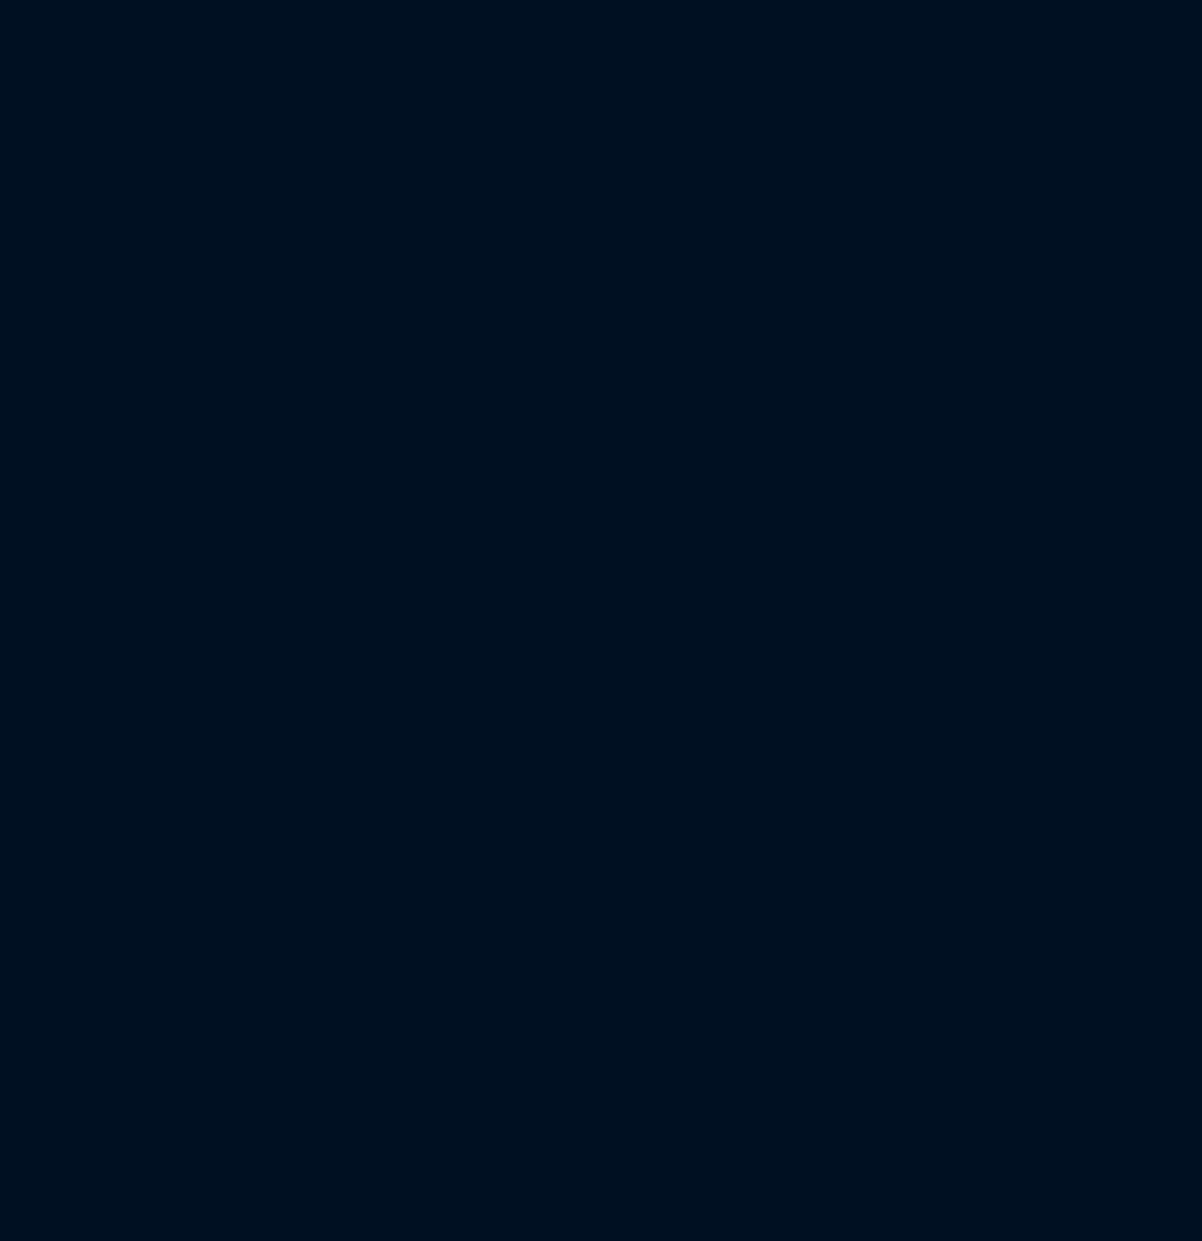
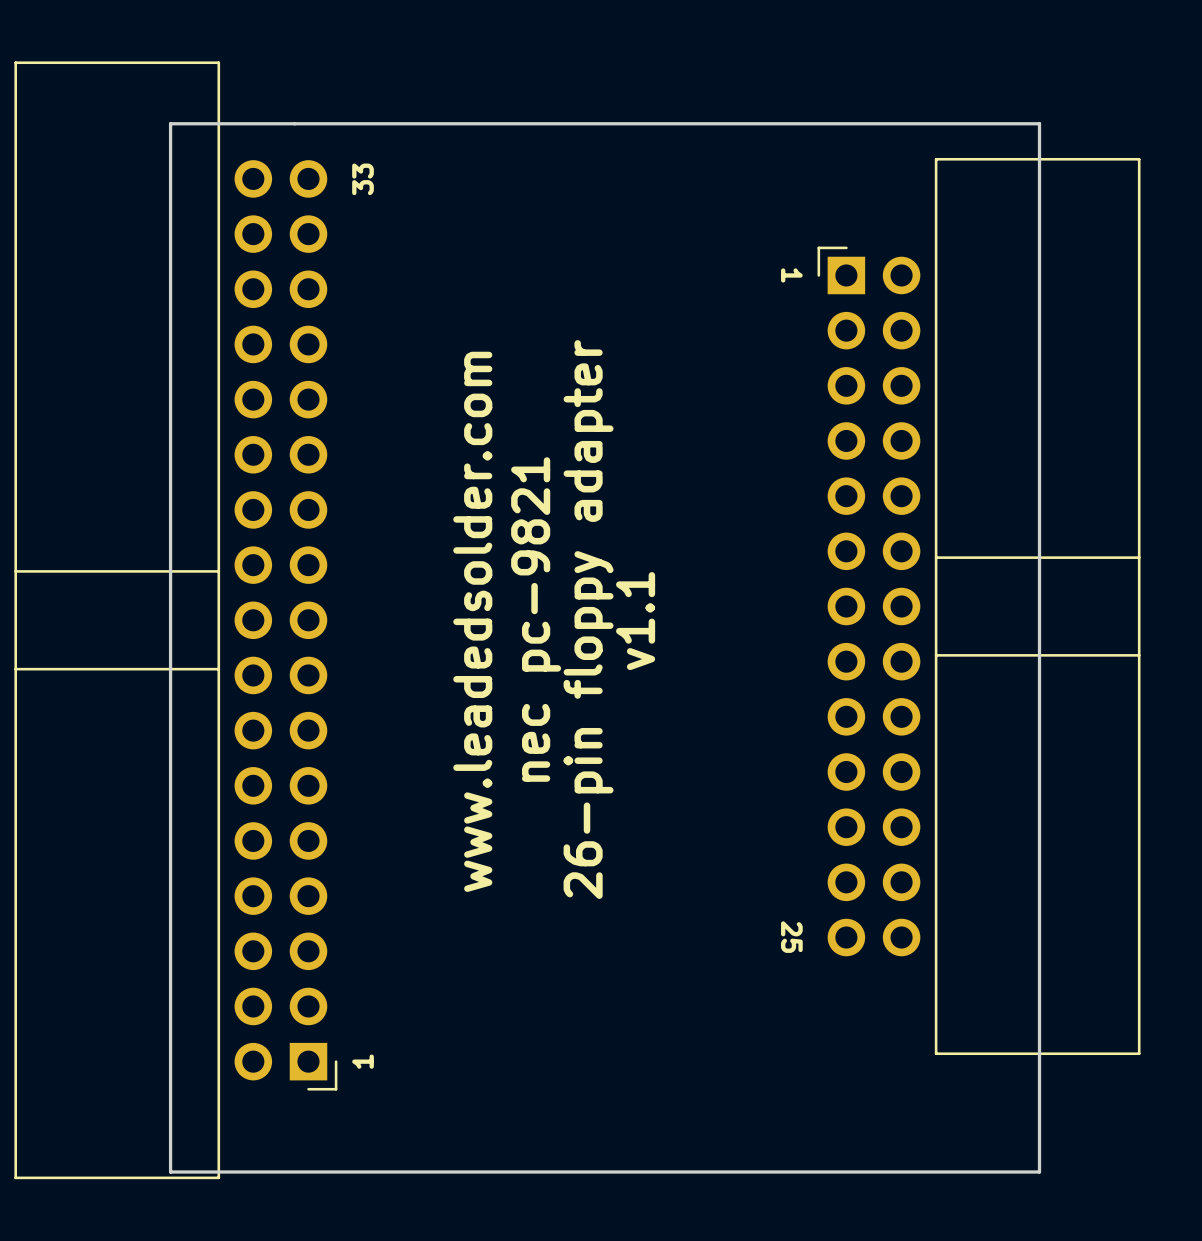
board edge: none -> (170, 123) (1039, 123) (1039, 1171) (170, 1171) (170, 123)
text: none -> 33 (363, 179)
text: none -> 1 (791, 275)
part: none -> (979, 606)
text: none -> nec pc-9821 (536, 619)
text: none -> 26-pin floppy adapter (588, 619)
part: none -> (175, 620)
text: none -> www.leadedsolder.com (472, 621)
text: none -> v1.1 (635, 621)
text: none -> 25 (791, 937)
text: none -> 1 (363, 1061)

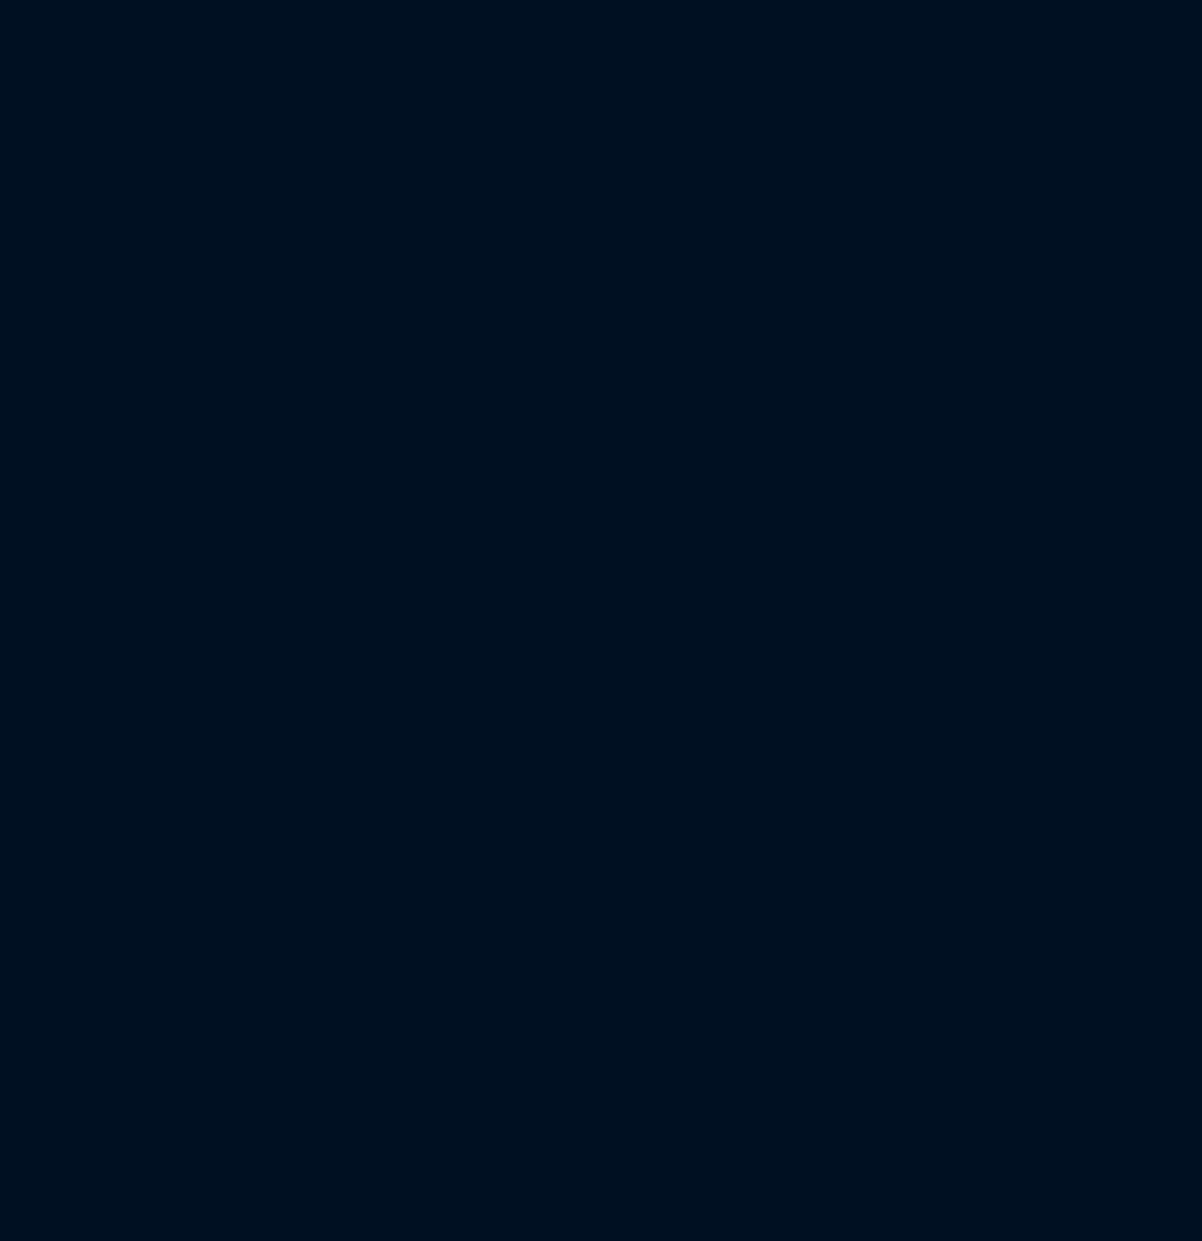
board edge: (170, 123) (1039, 123) (1039, 1171) (170, 1171) (170, 123) -> none
text: 33 (363, 179) -> none
text: 1 (791, 275) -> none
part: (979, 606) -> none
text: nec pc-9821 (536, 619) -> none
text: 26-pin floppy adapter (588, 619) -> none
part: (175, 620) -> none
text: www.leadedsolder.com (472, 621) -> none
text: v1.1 (635, 621) -> none
text: 25 (791, 937) -> none
text: 1 (363, 1061) -> none

